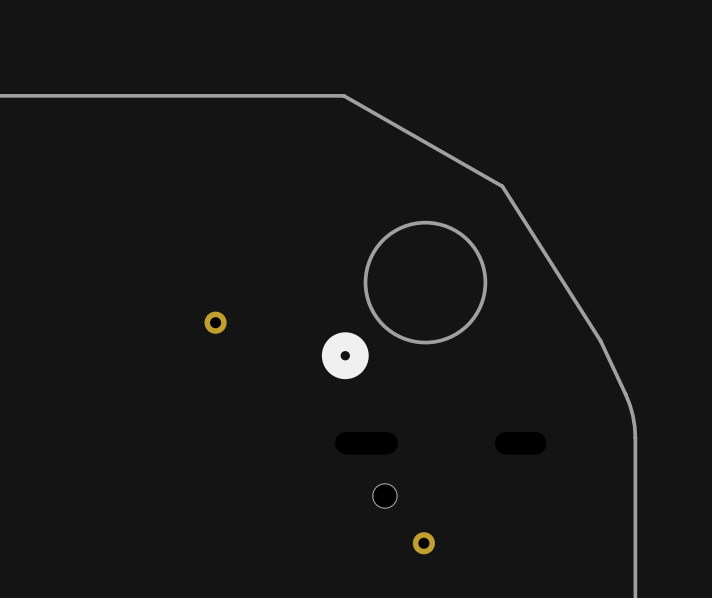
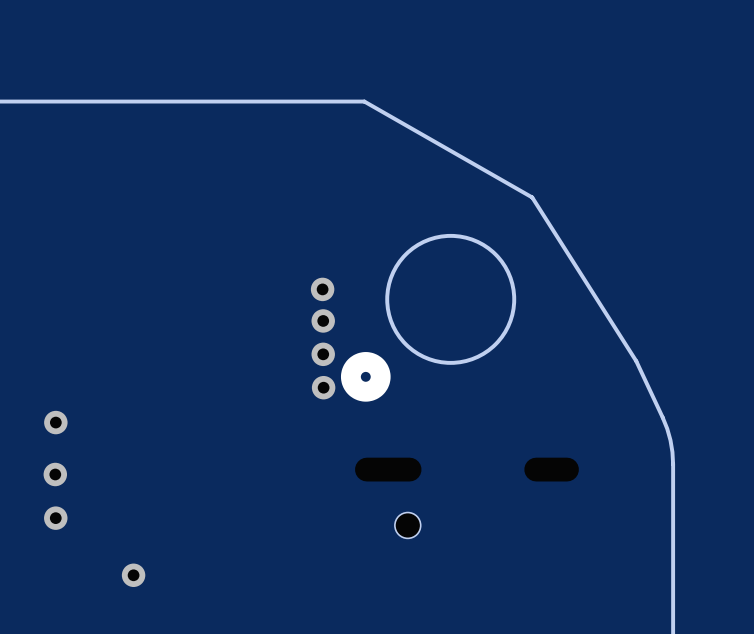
via: none -> (322, 289)
via: none -> (323, 320)
via: (215, 322) -> none
via: none -> (323, 354)
via: none -> (323, 387)
via: none -> (55, 422)
via: none -> (55, 474)
via: none -> (55, 518)
via: none -> (133, 575)
via: (423, 543) -> none

